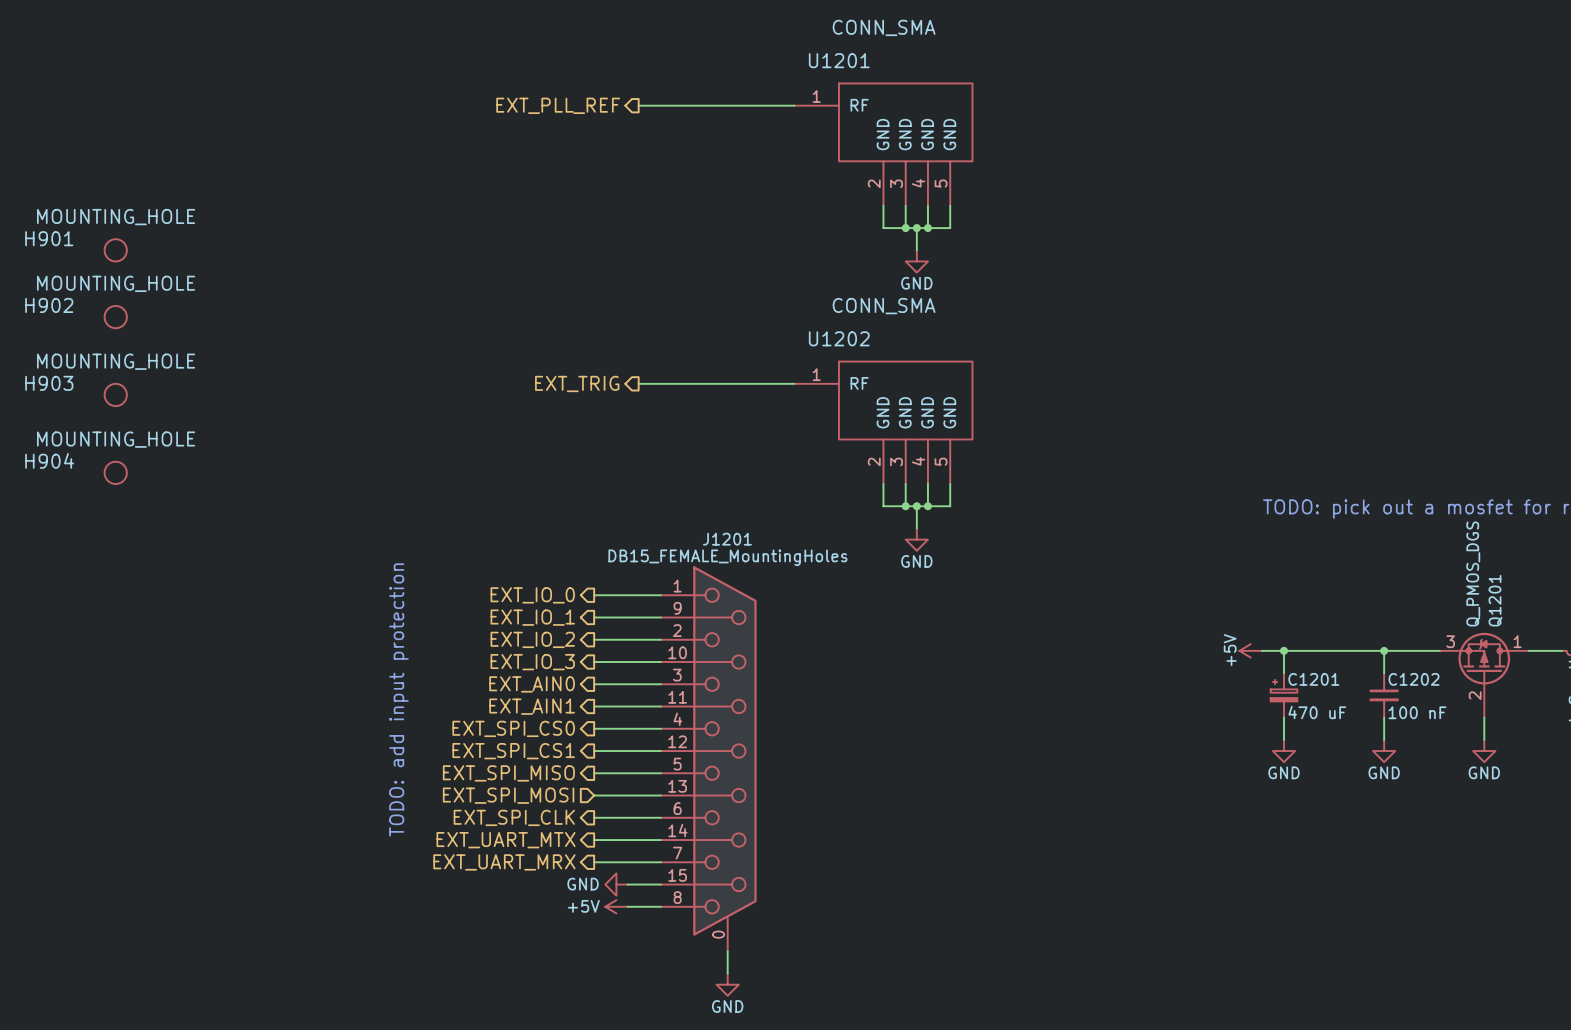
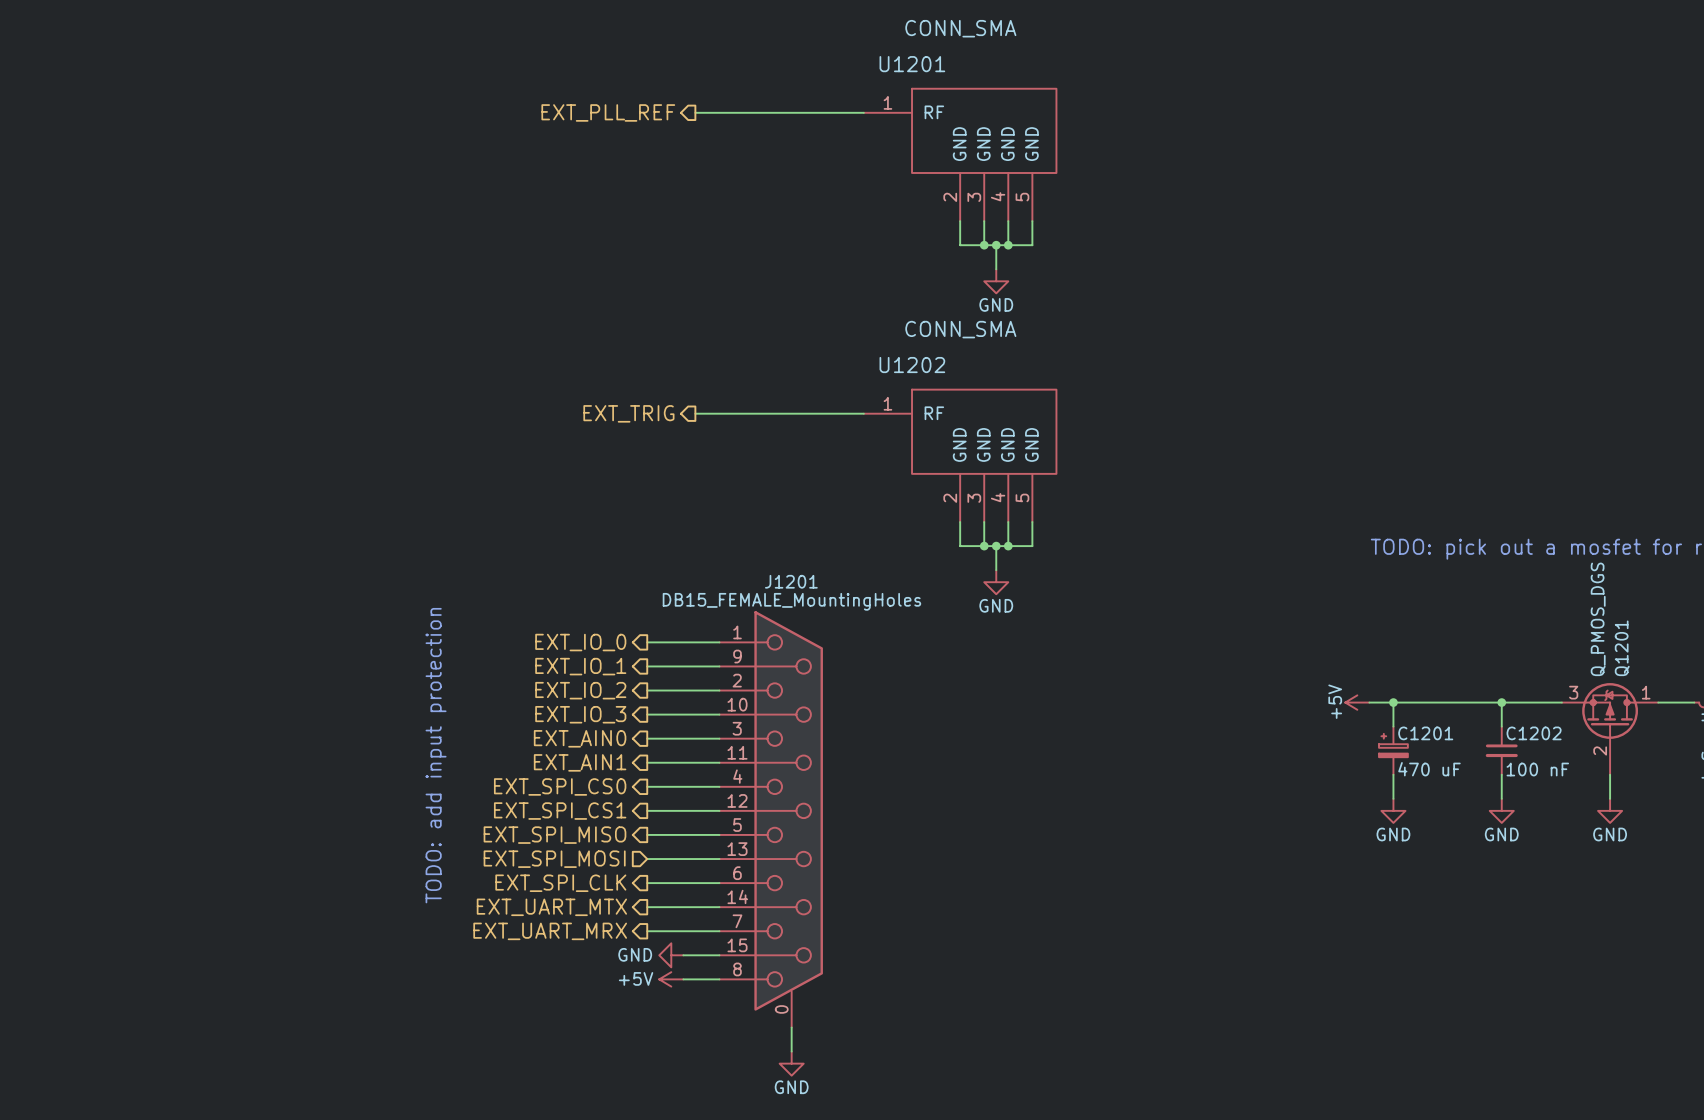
H901: MOUNTING_HOLE (115, 250) -> none
H902: MOUNTING_HOLE (115, 317) -> none
H903: MOUNTING_HOLE (115, 394) -> none
H904: MOUNTING_HOLE (115, 472) -> none

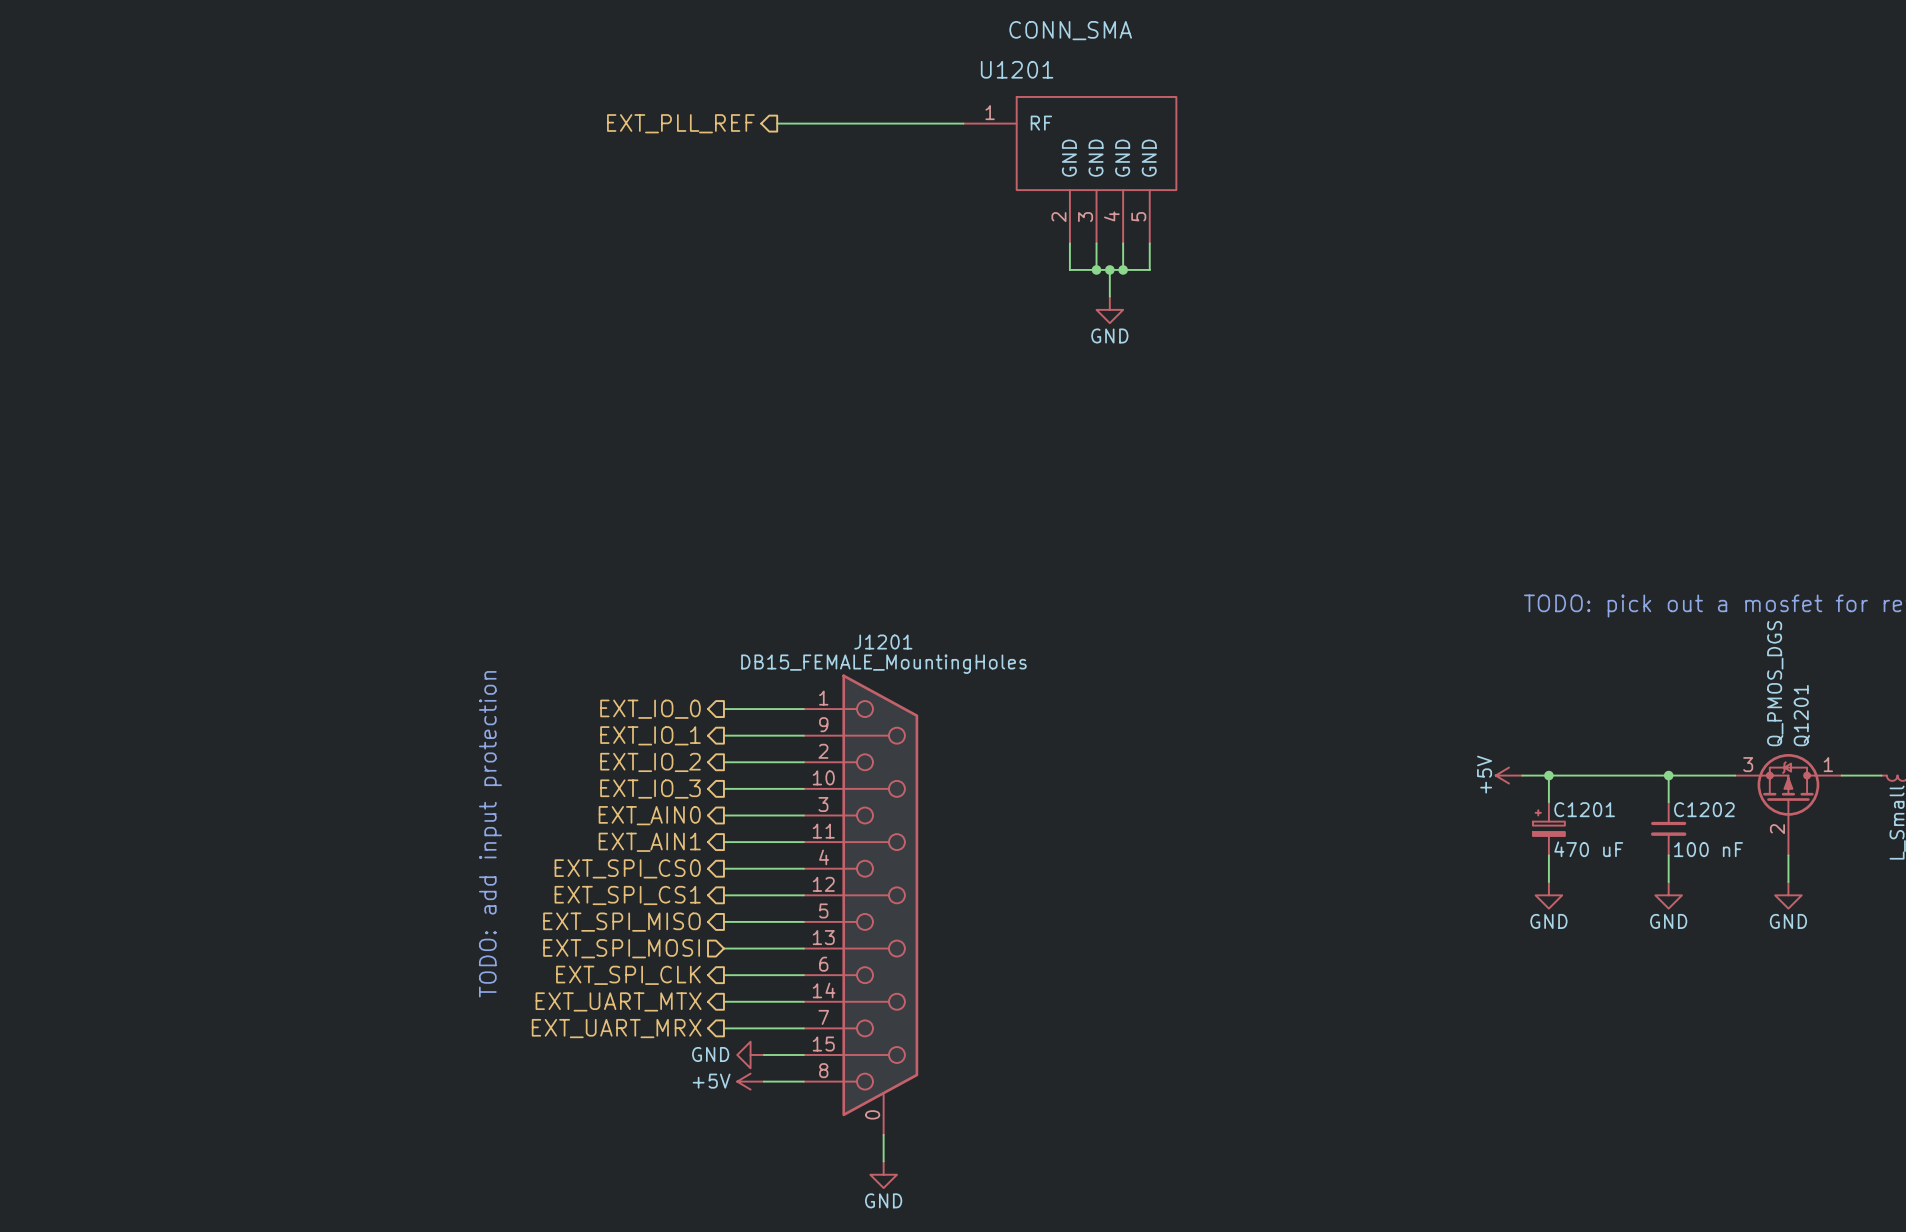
hierarchical label: EXT_TRIG (628, 413) -> none
wire: (695, 413) (863, 413) -> none
U1202: CONN_SMA (960, 455) -> none
wire: (960, 522) (960, 546) (1032, 546) (1032, 522) -> none
wire: (984, 522) (984, 546) -> none
wire: (1008, 522) (1008, 546) -> none
junction: (984, 546) -> none
wire: (996, 546) (996, 570) -> none
junction: (996, 546) -> none
junction: (1008, 546) -> none
power symbol: GND (996, 582) -> none

